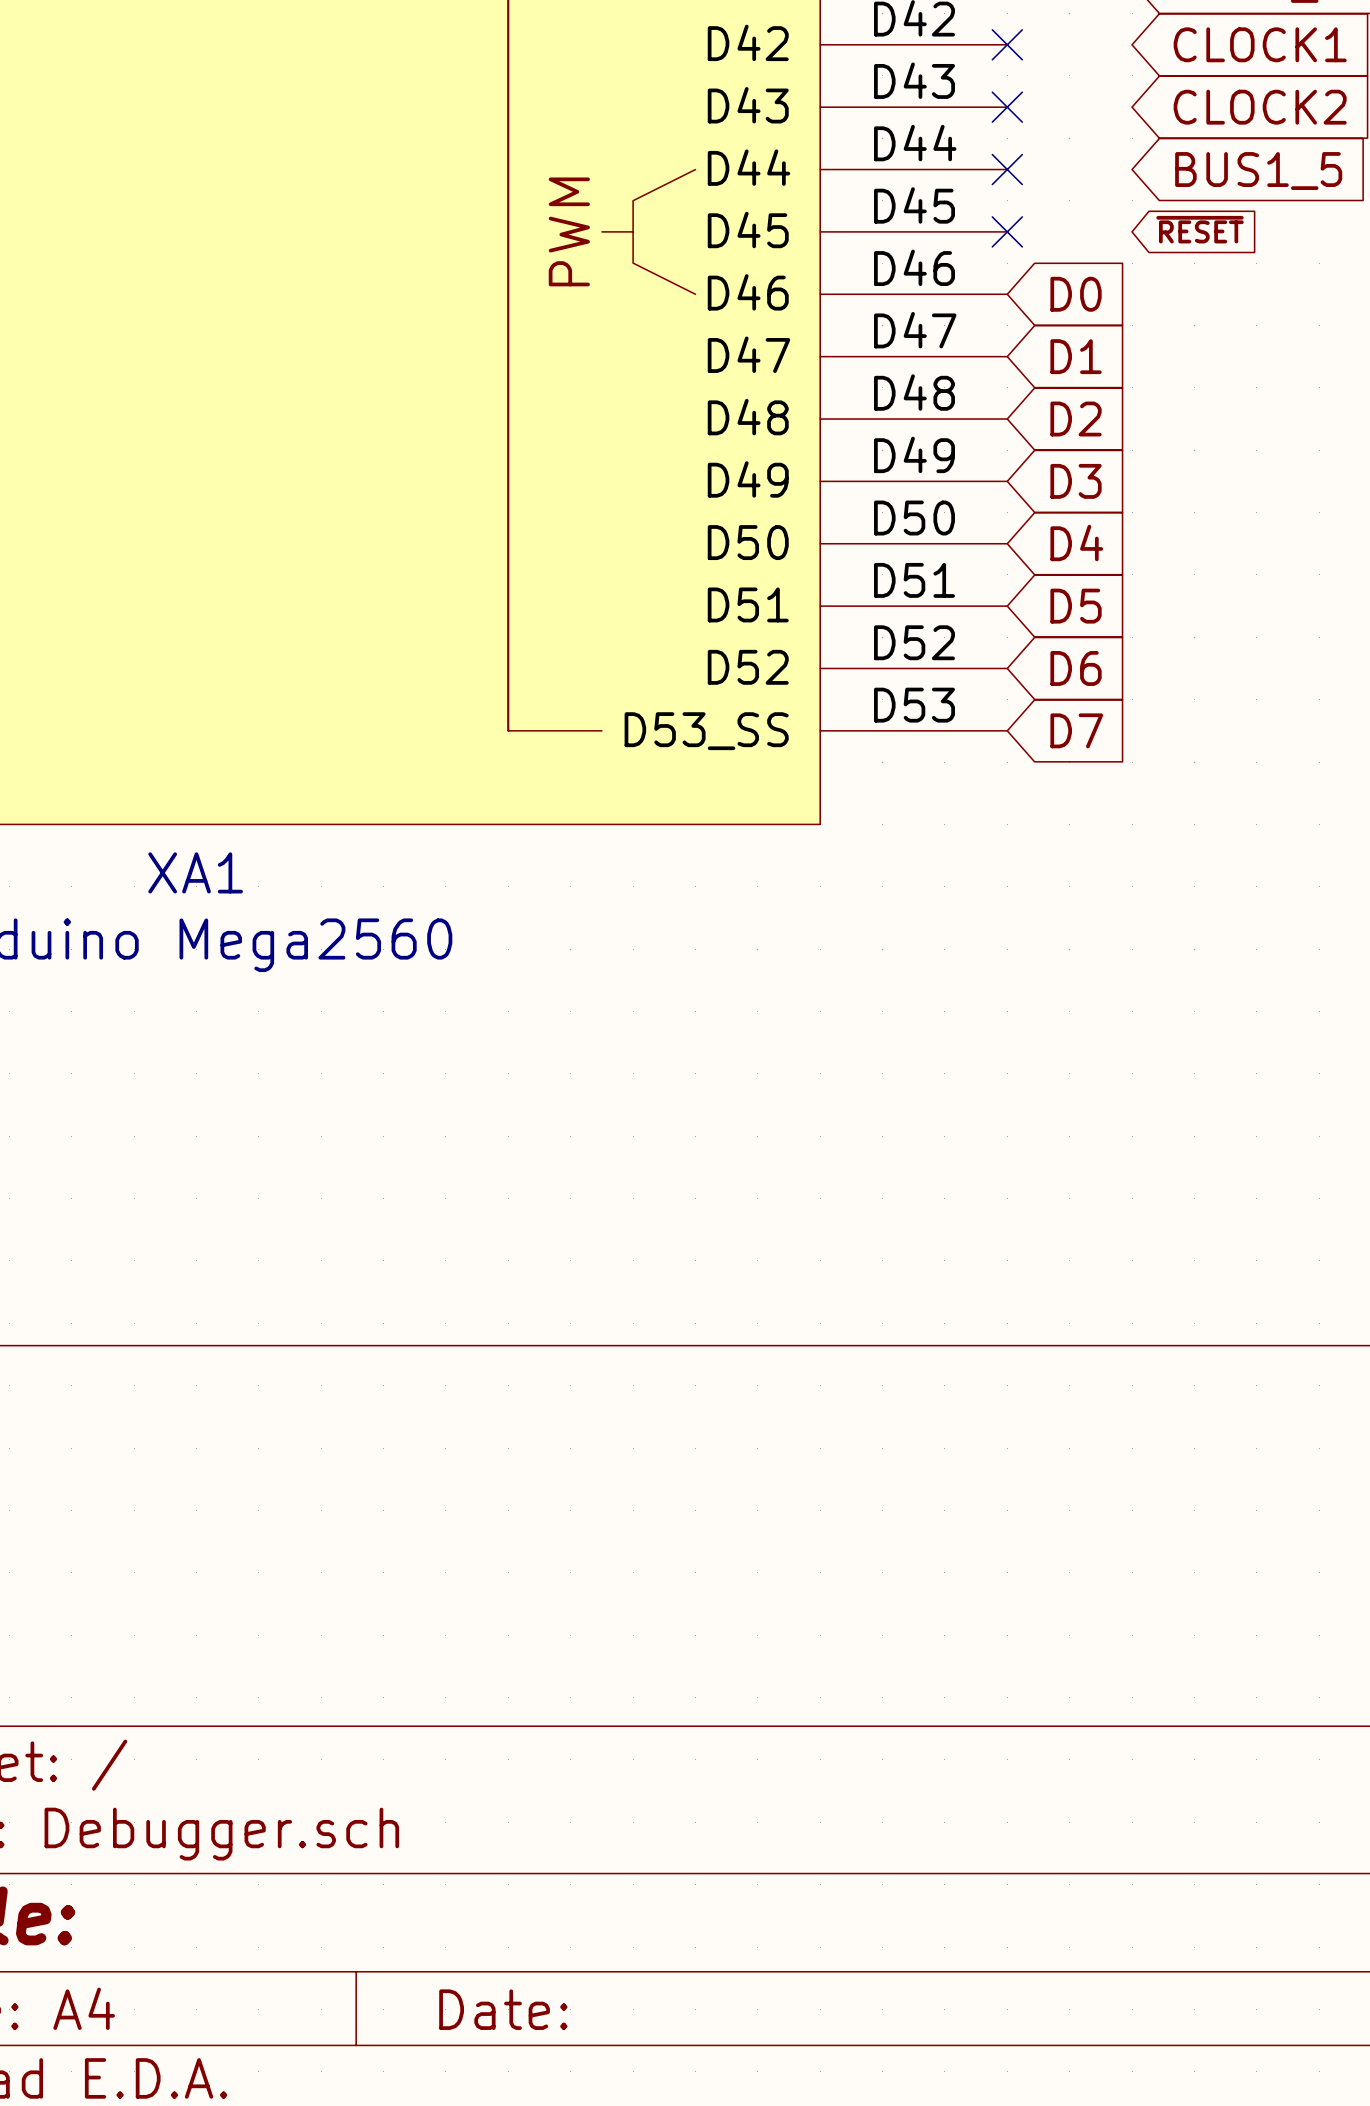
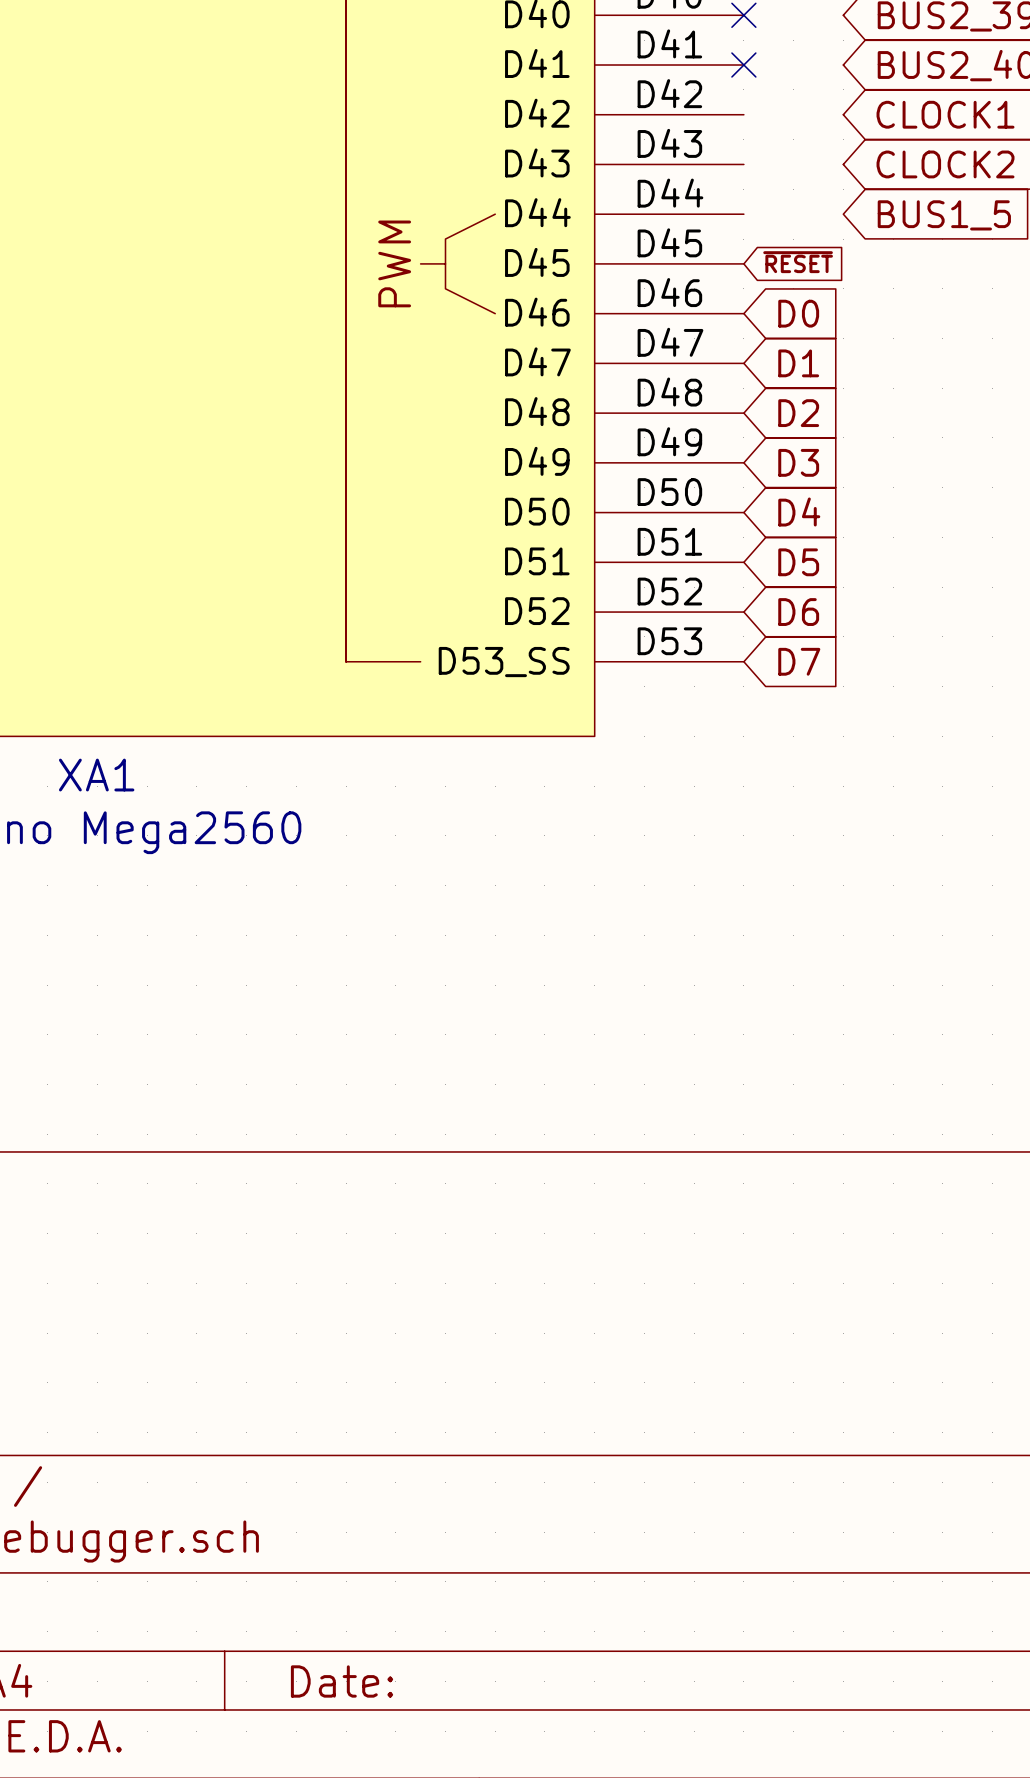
no-connect mark: (1007, 44) -> none
no-connect mark: (1007, 107) -> none
no-connect mark: (1007, 169) -> none
global label position: ~{RESET} (1200, 229) -> ~{RESET} (798, 262)
no-connect mark: (1007, 231) -> none

